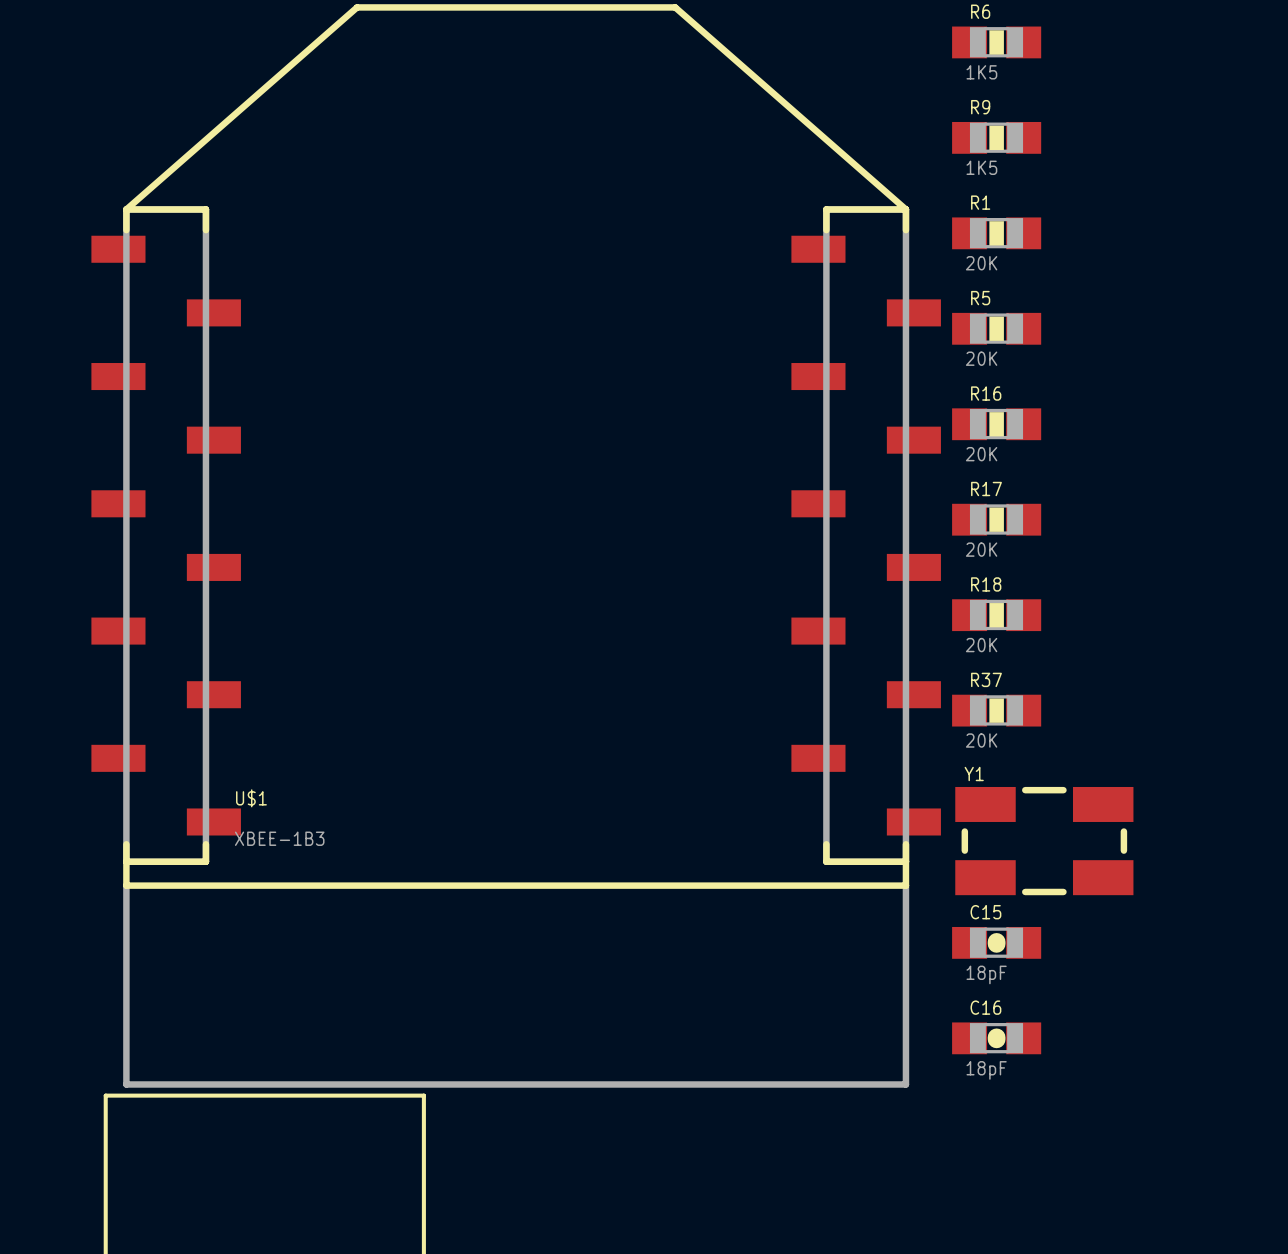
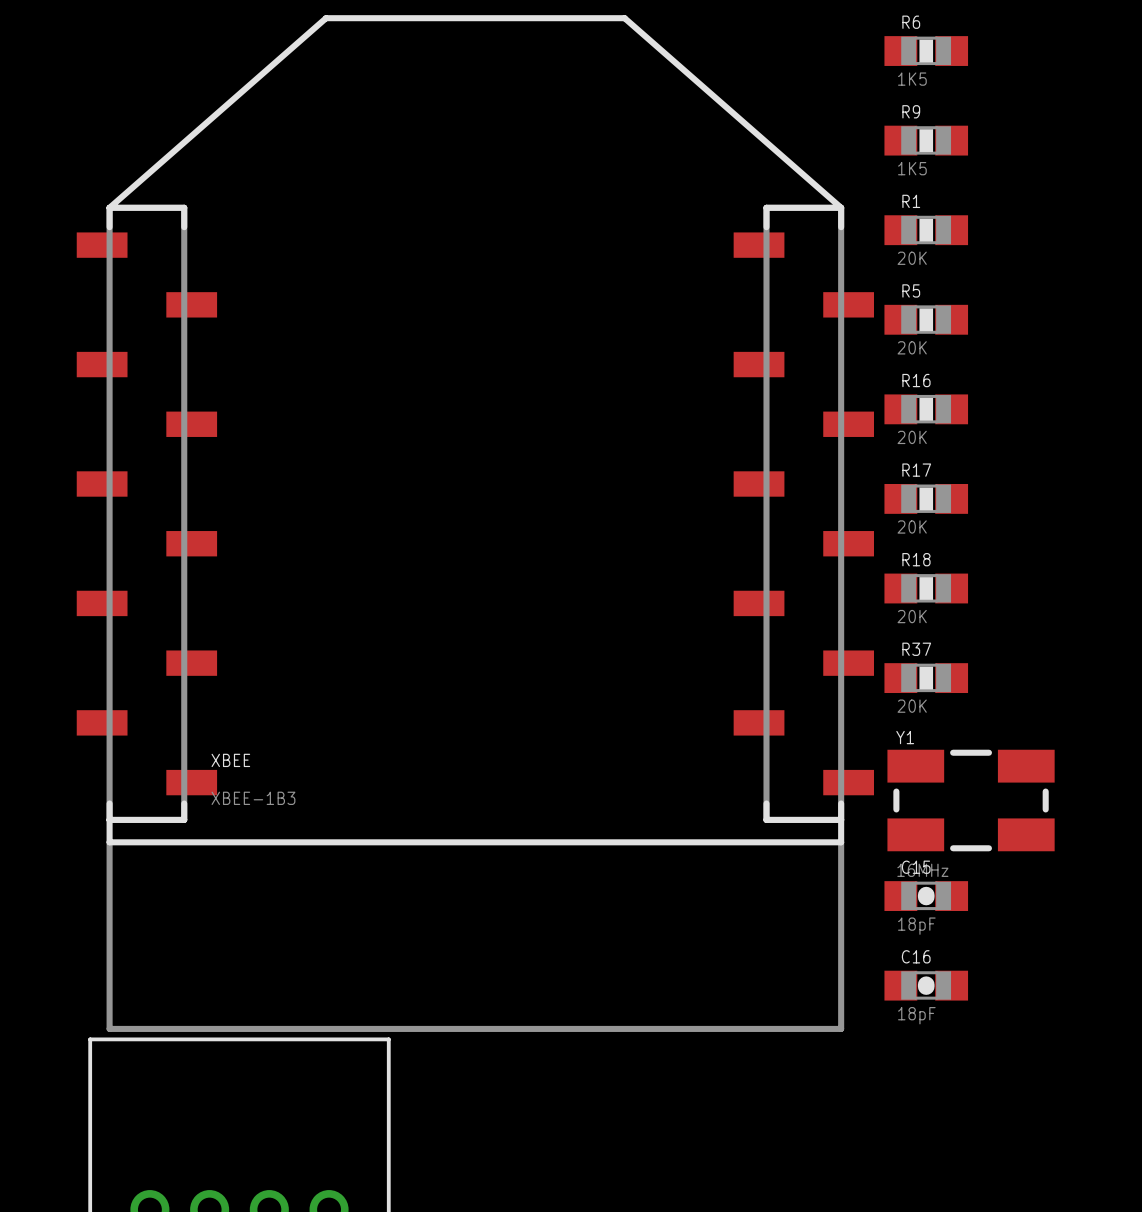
U$1 name: U$1 (251, 798) -> XBEE (230, 760)
Y1 value: none -> 16MHz (922, 870)

